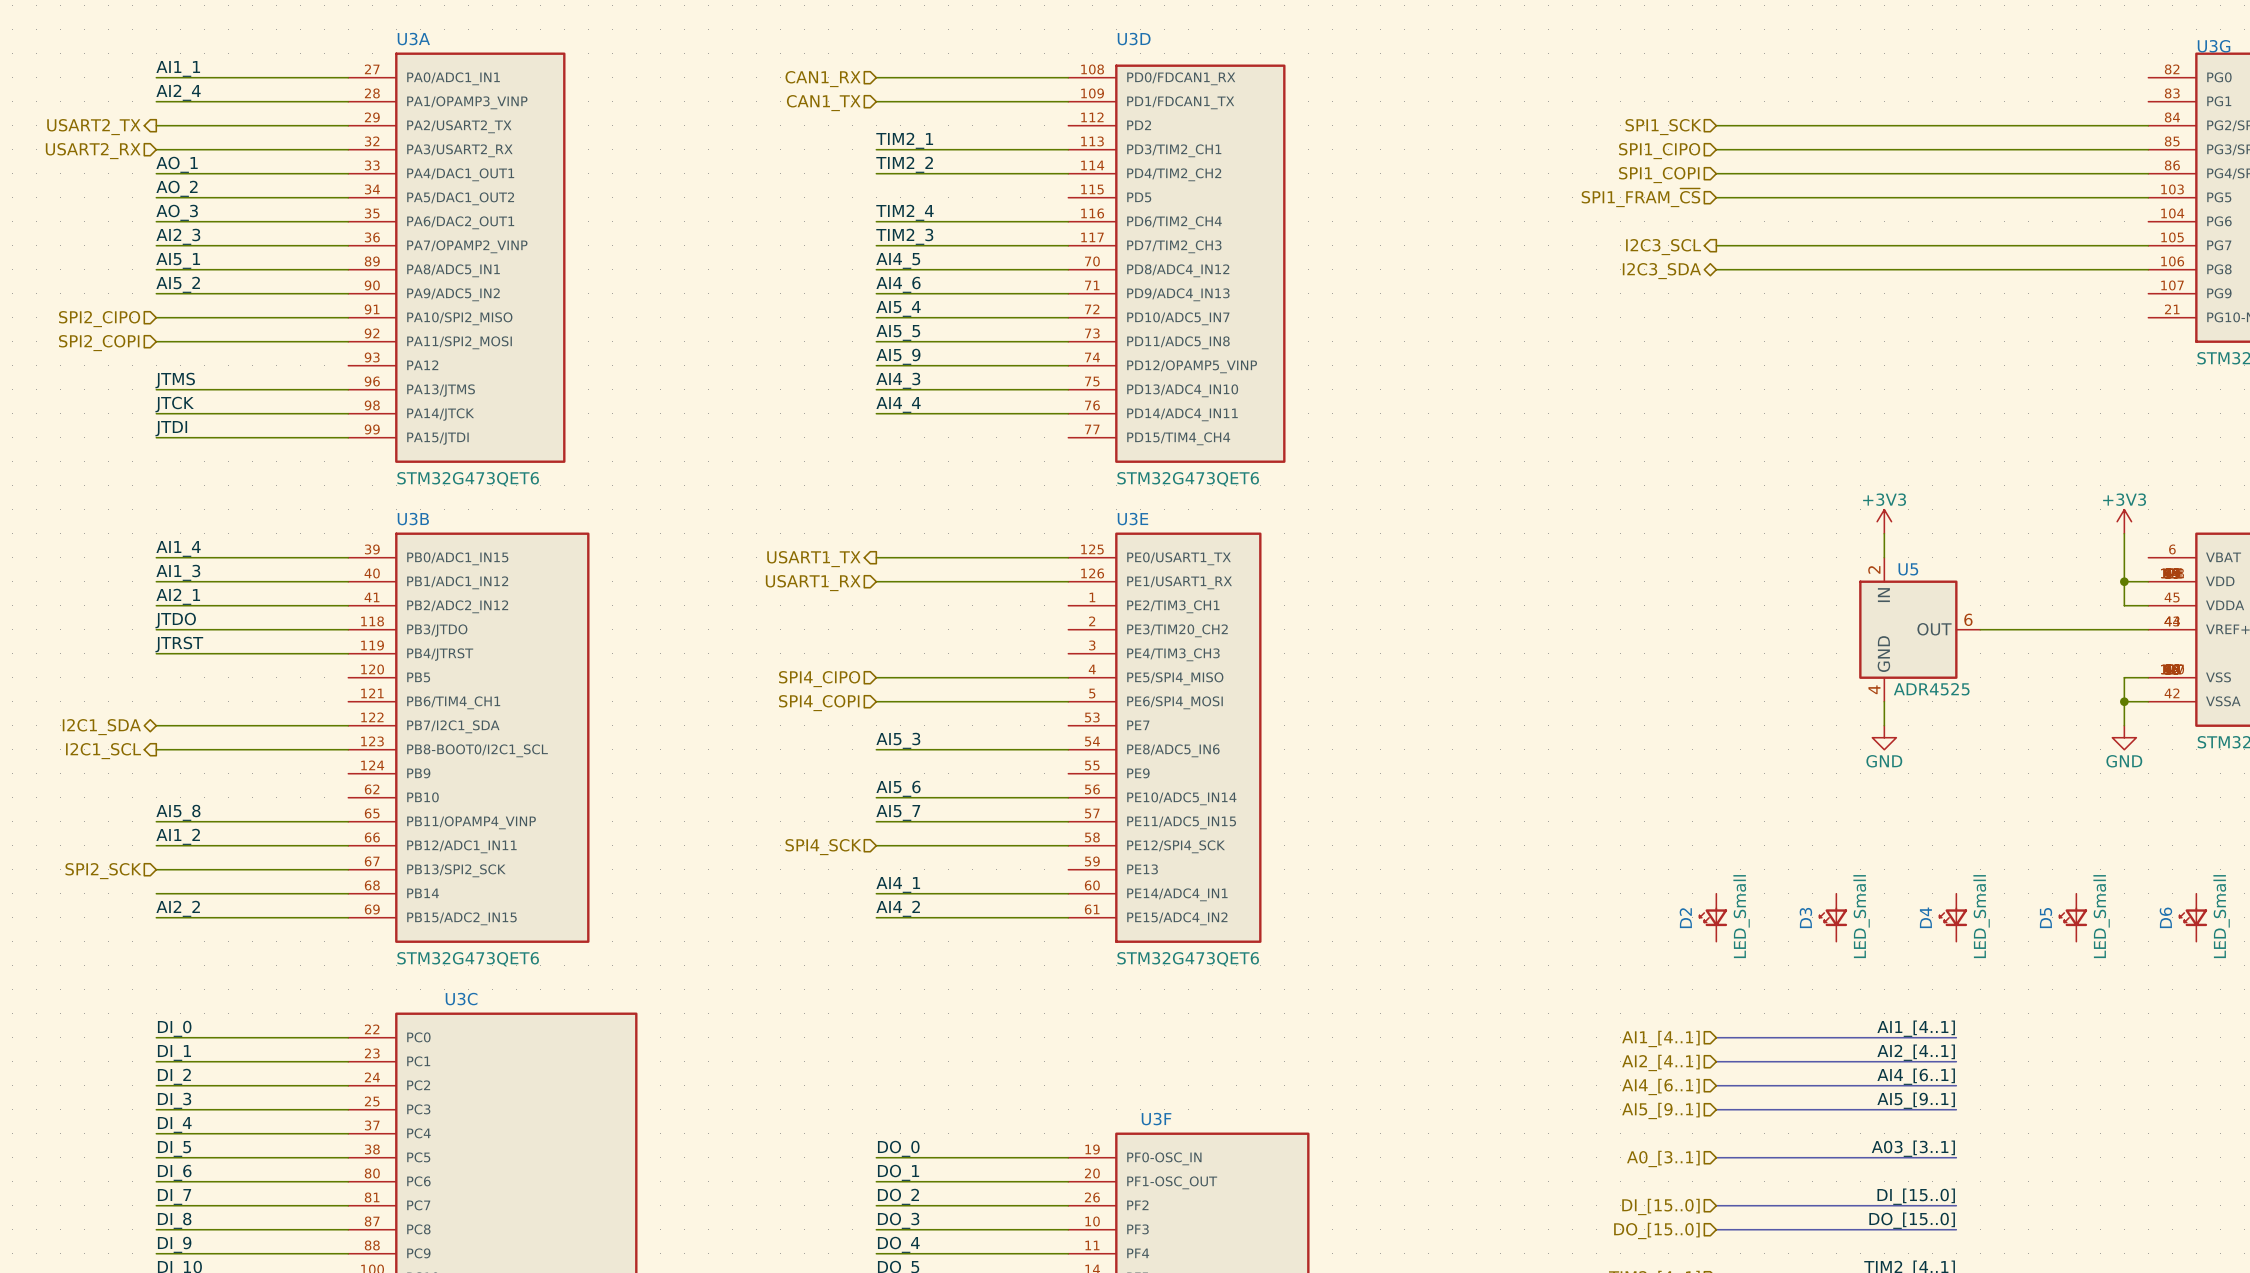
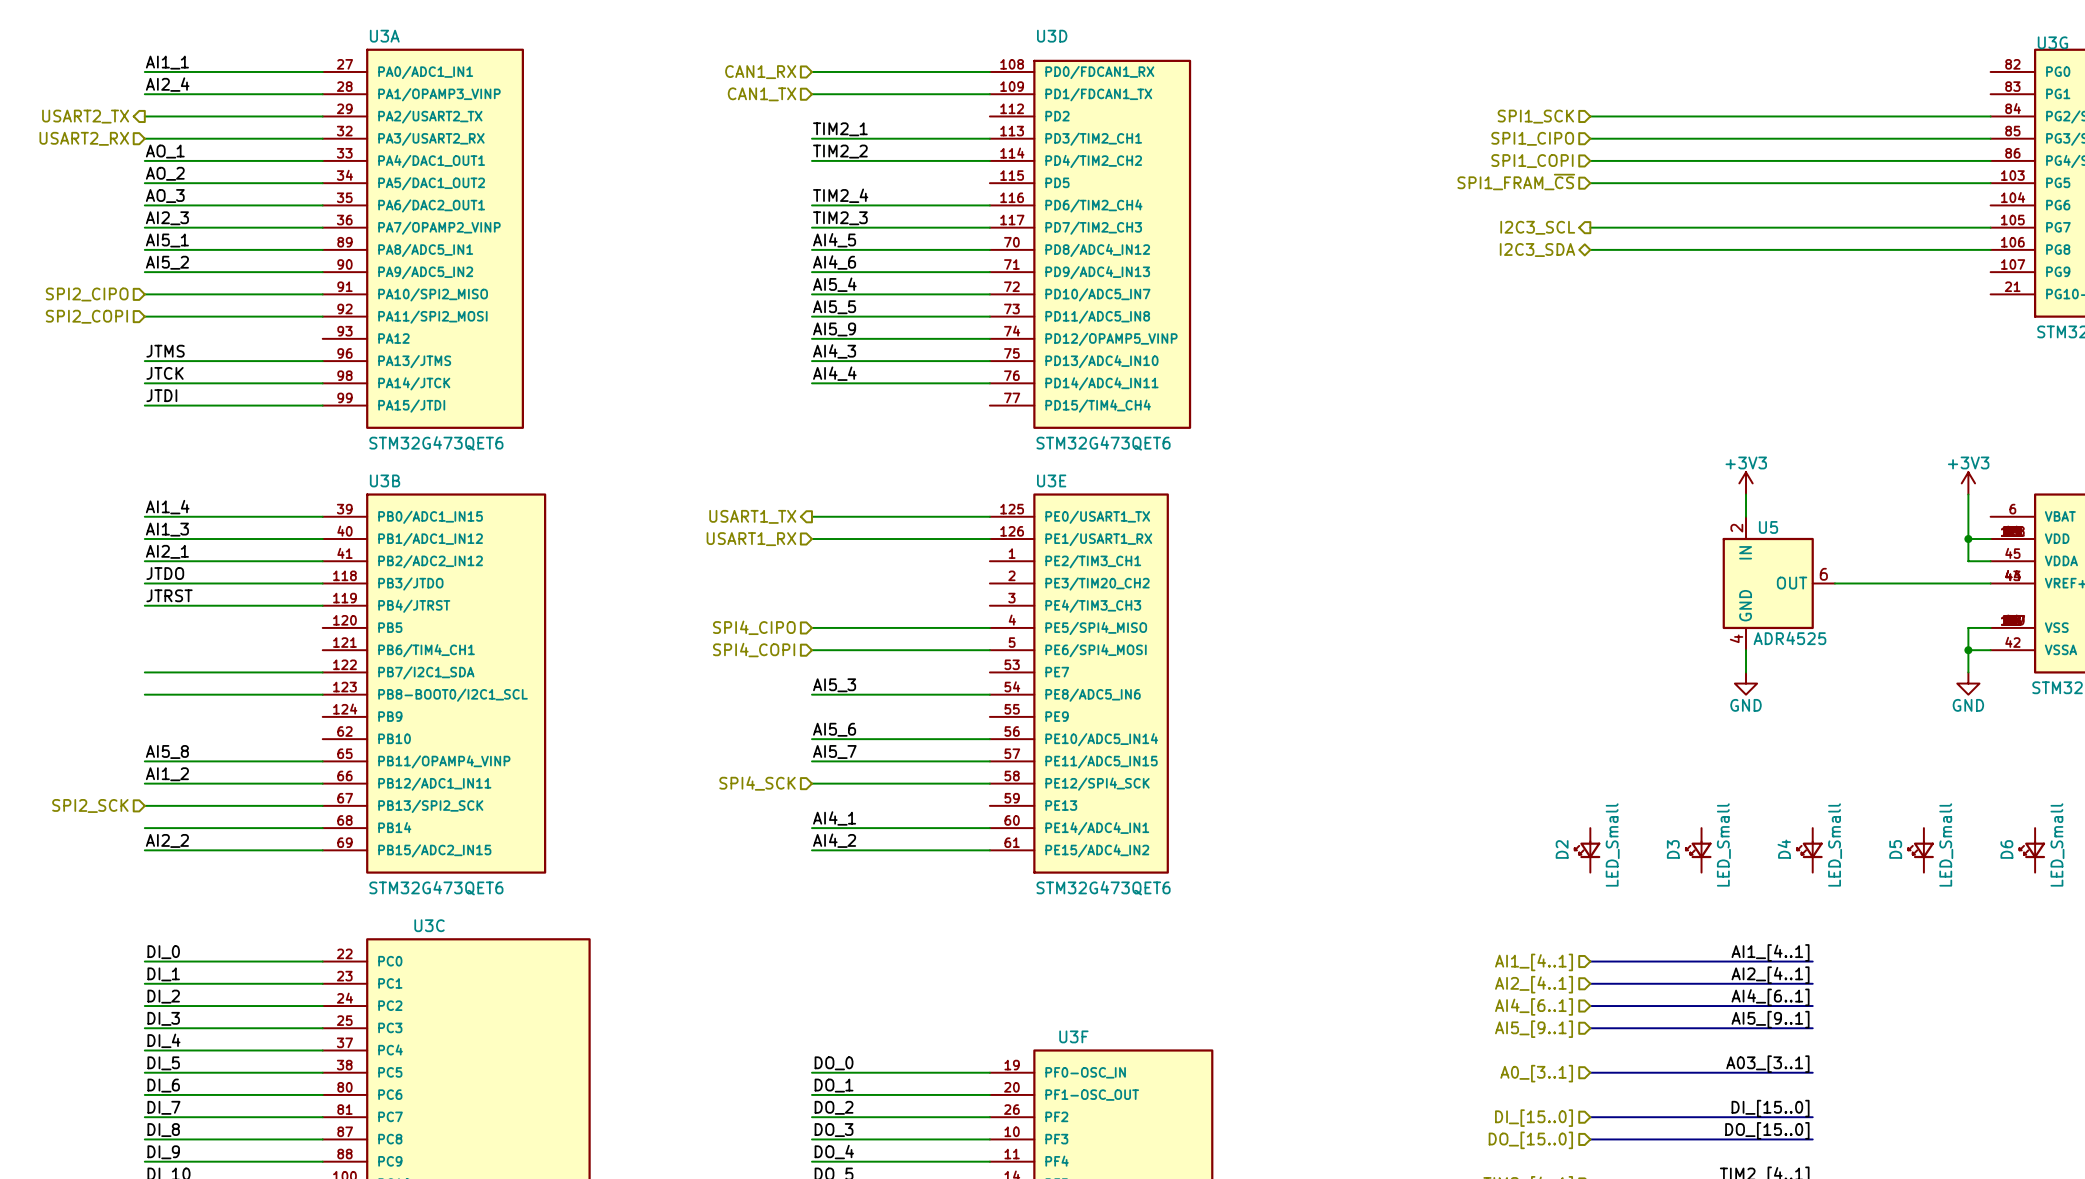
hierarchical label: I2C1_SDA (101, 727) -> none
hierarchical label: I2C1_SCL (103, 751) -> none

